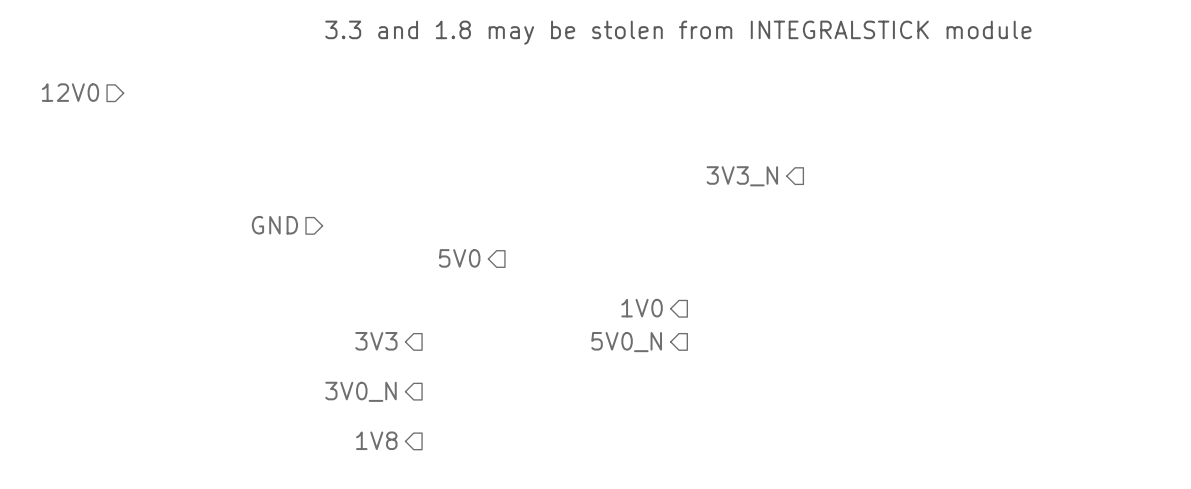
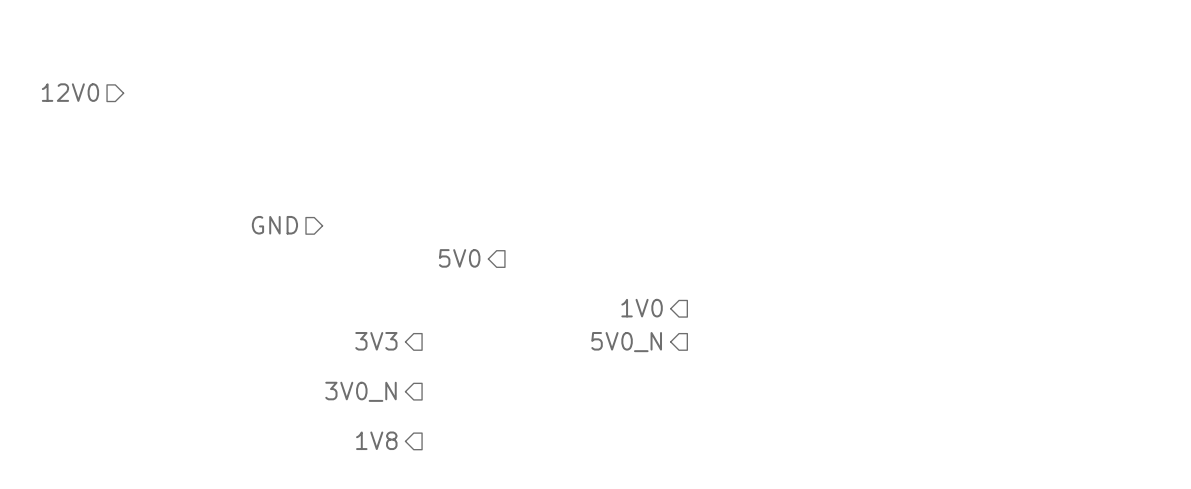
text: 3.3 and 1.8 may be stolen from INTEGRALSTICK module (678, 32) -> none
hierarchical label: 3V3_N (742, 176) -> none

